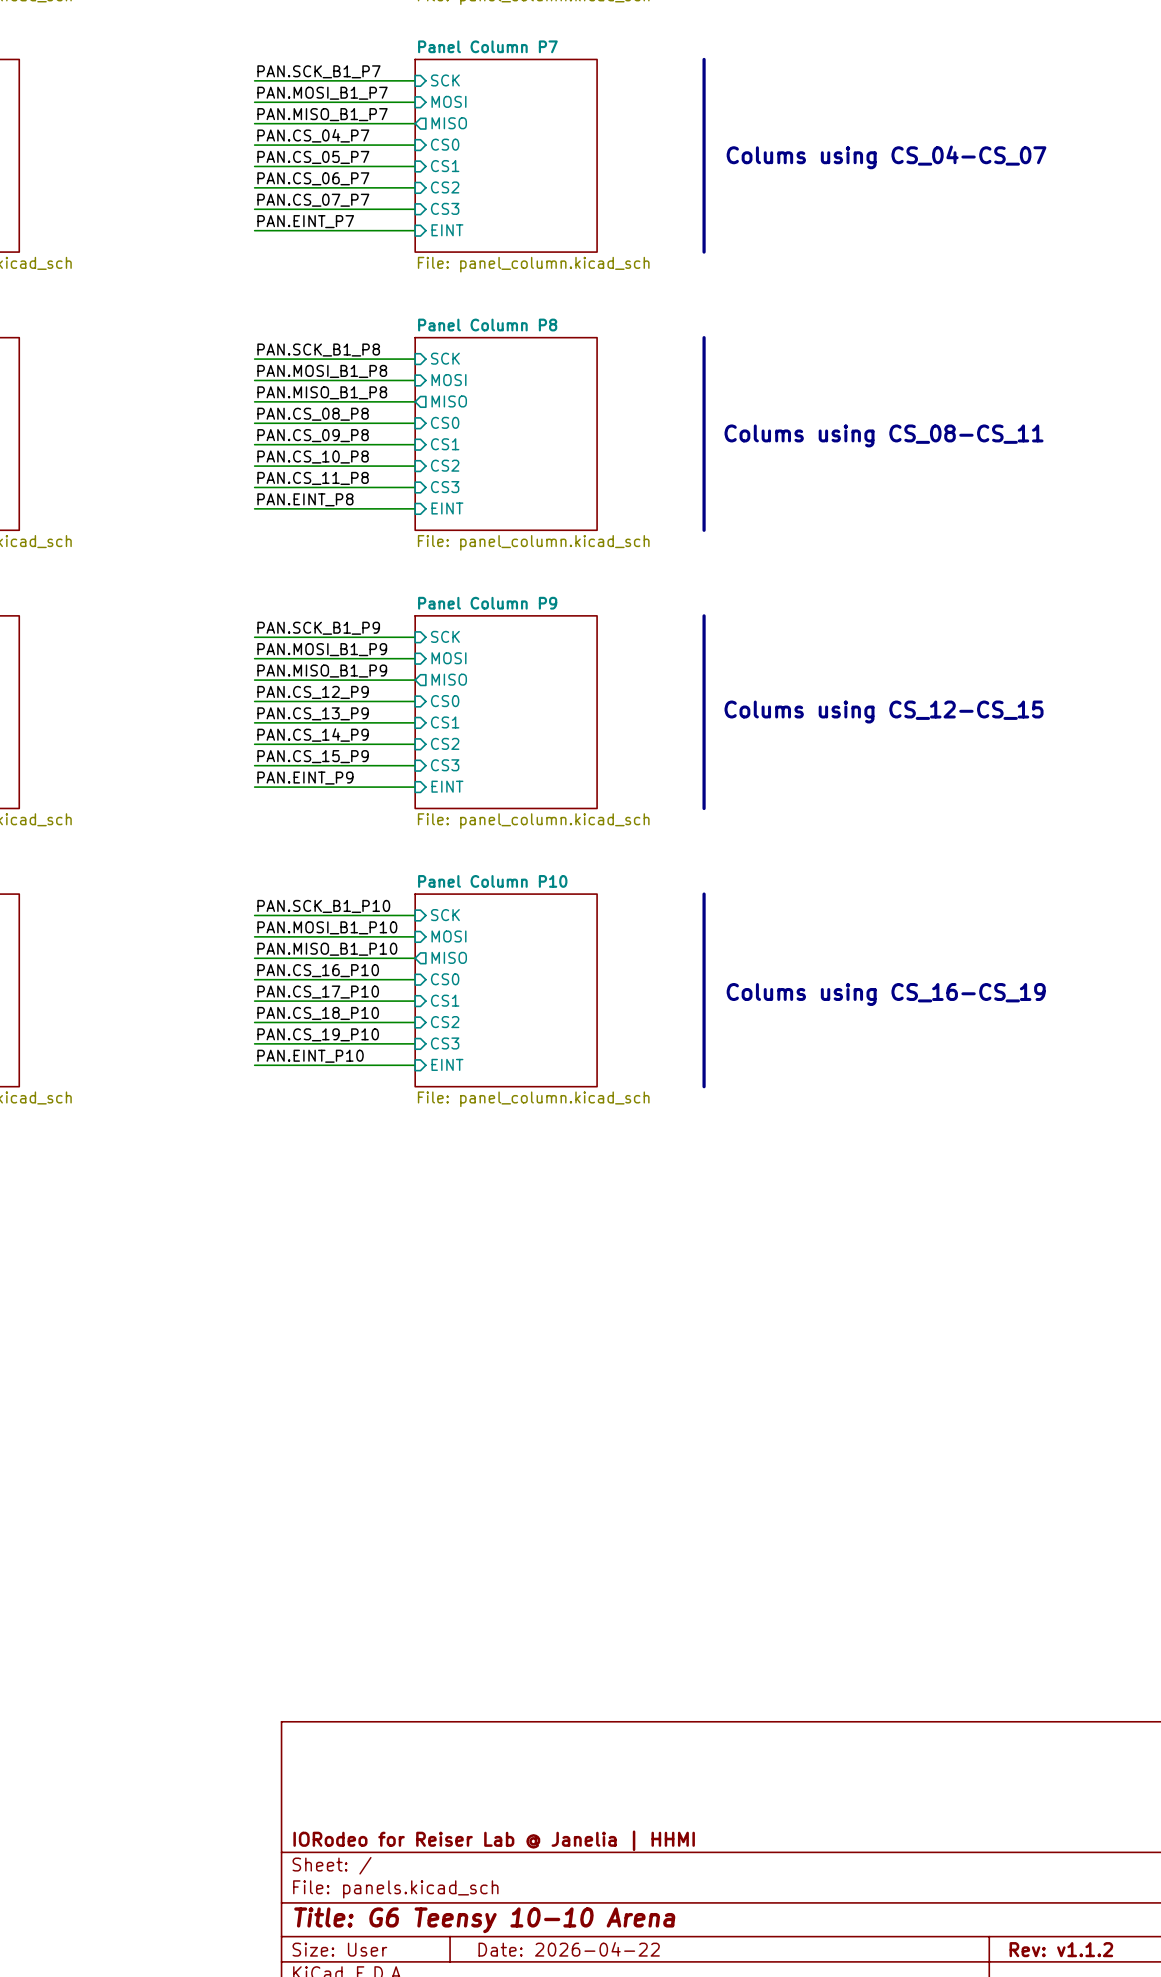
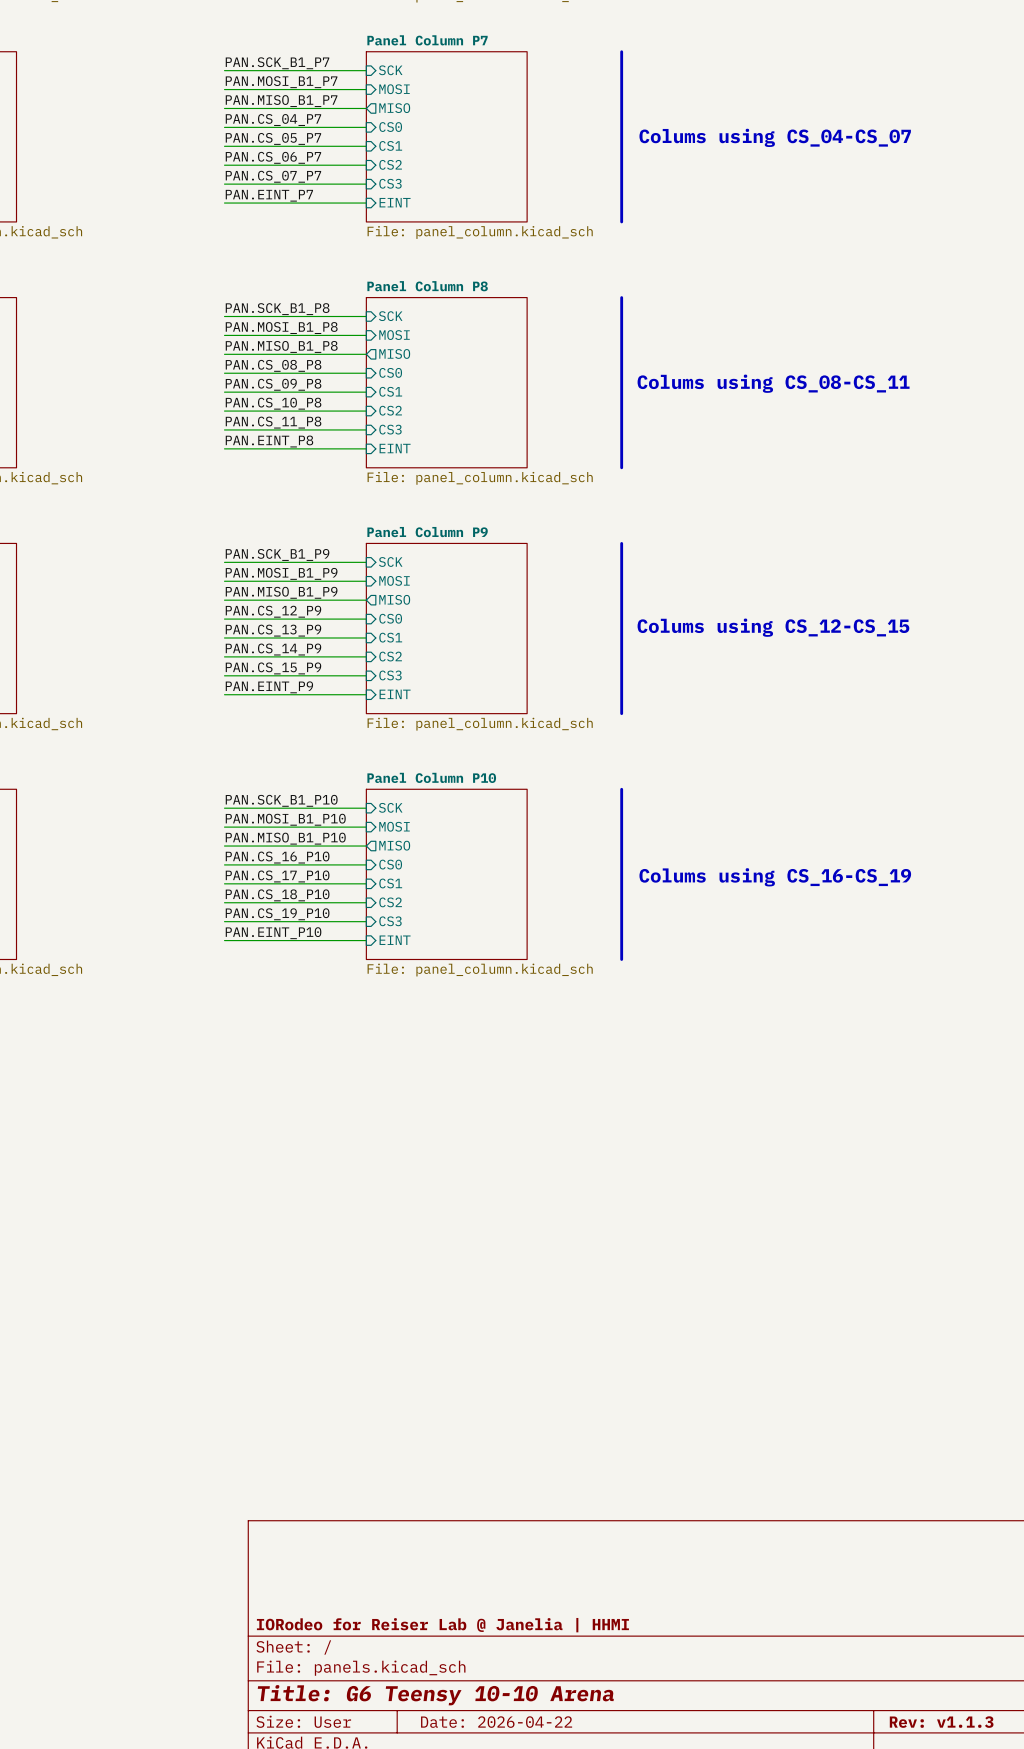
title block: Rev: v1.1.2 (1061, 1949) -> Rev: v1.1.3 (941, 1722)

